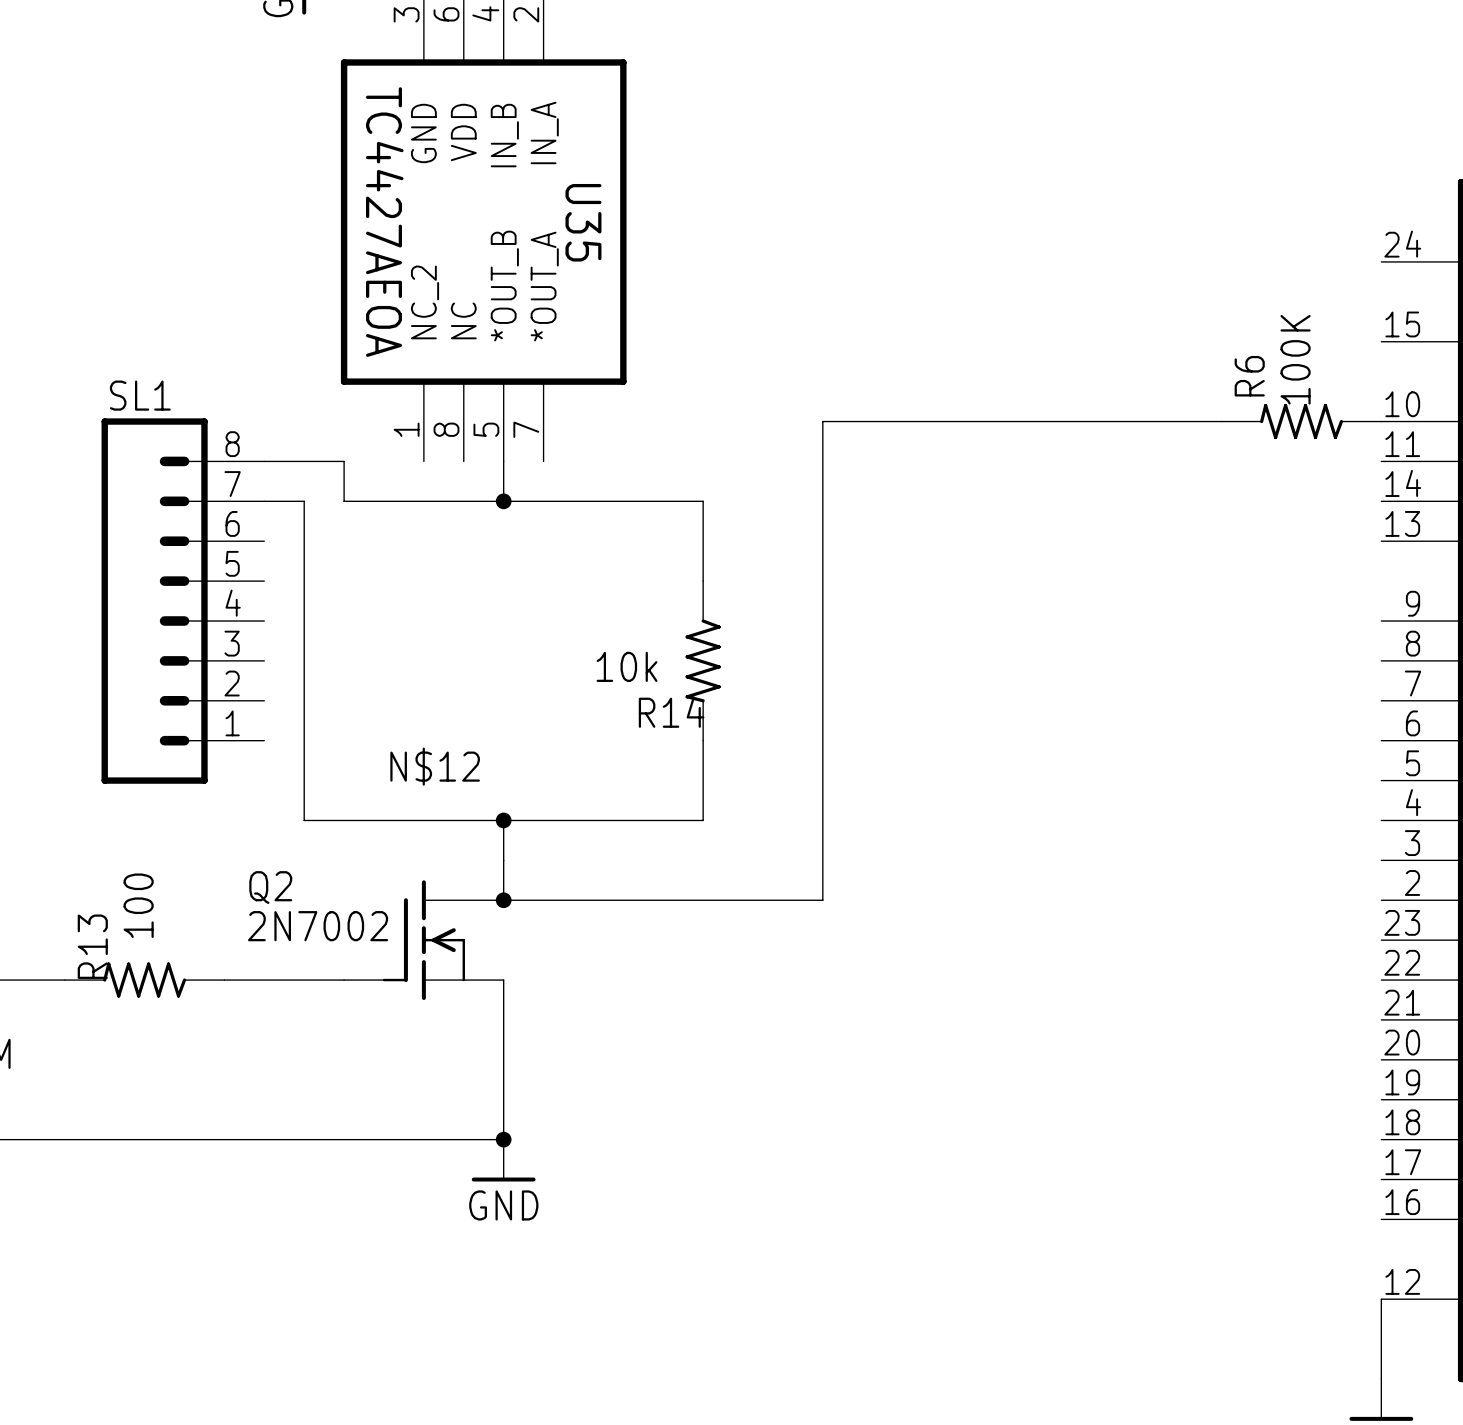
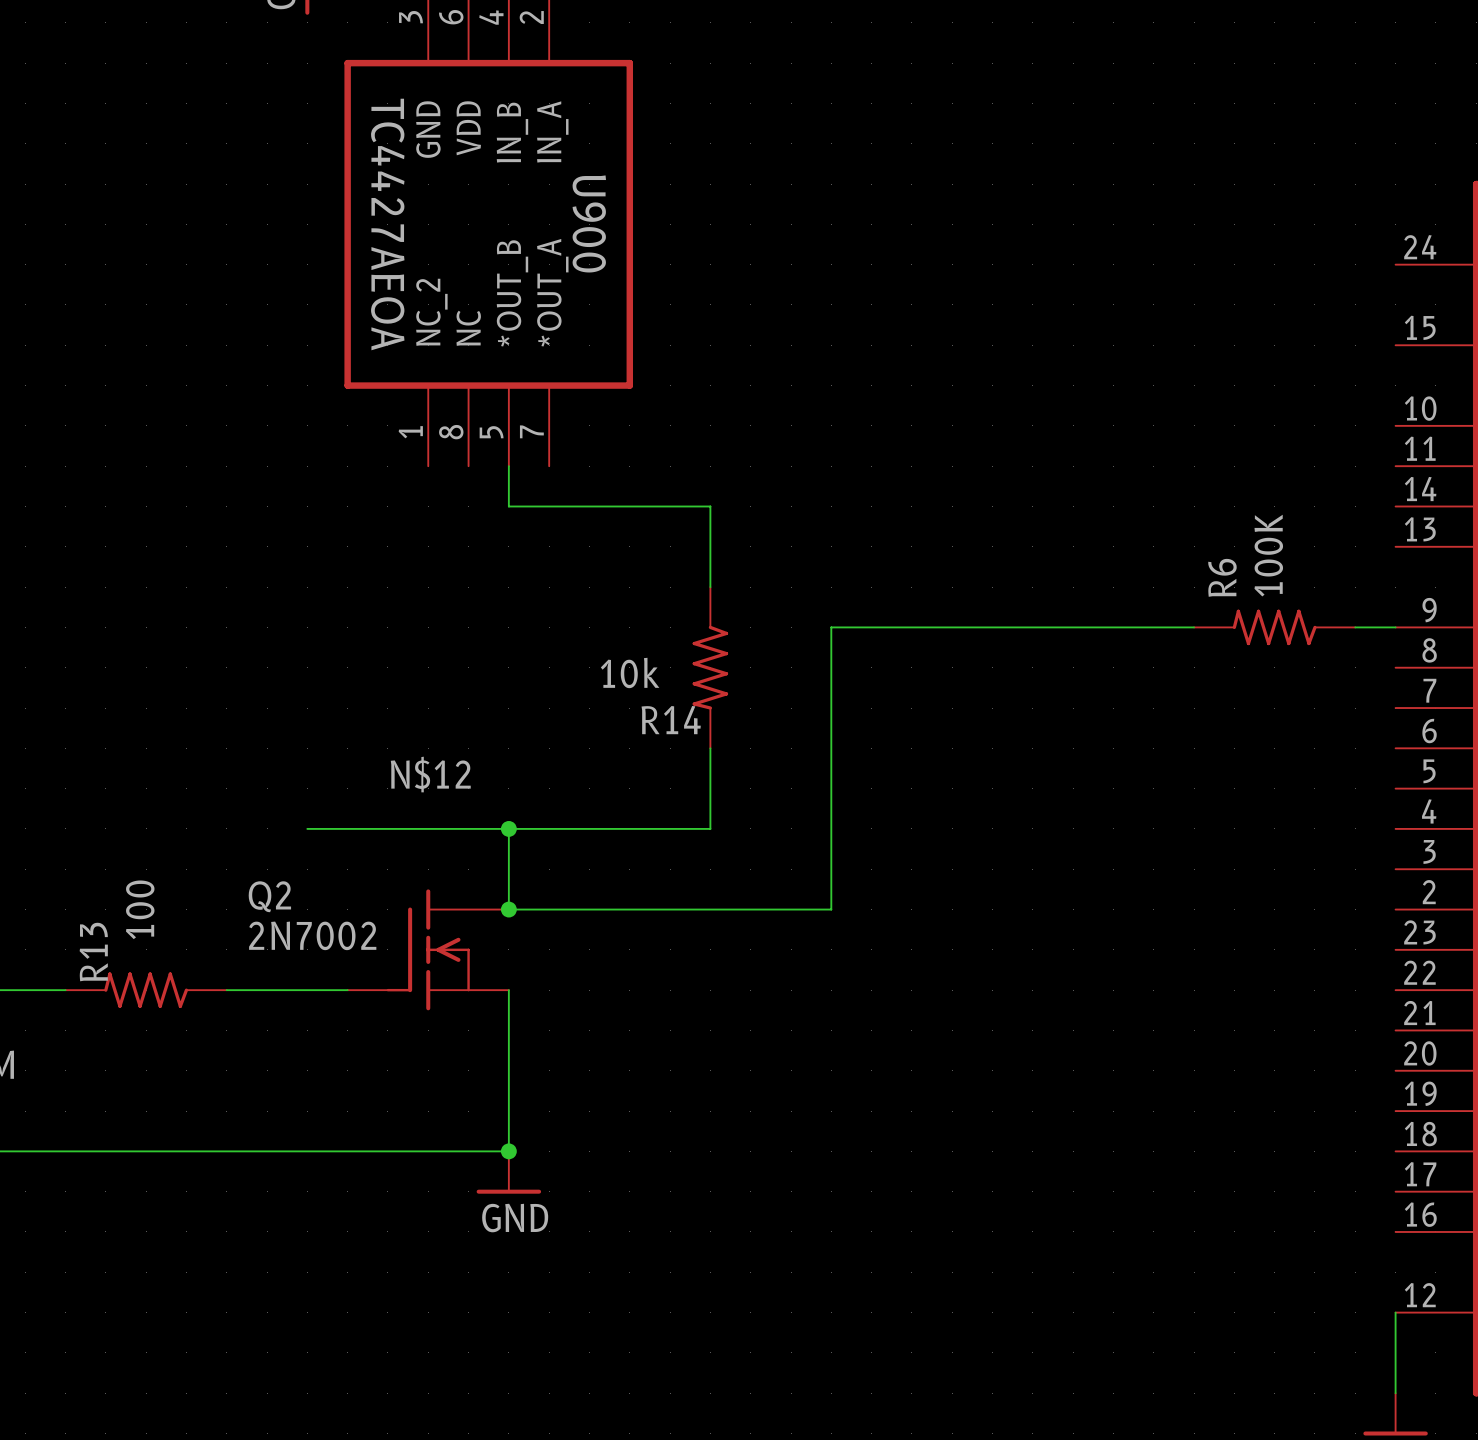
U35 name: U35 (583, 222) -> U900 (589, 223)
wire: (1221, 421) (822, 421) (822, 621) -> (1194, 627) (831, 627)
R6 position: (1301, 421) -> (1274, 627)
wire: (264, 461) (344, 461) (344, 501) (503, 501) -> none
wire: (264, 501) (304, 501) (304, 820) -> none
junction: (503, 501) -> none
SL1: (182, 601) -> none
wire: none -> (1355, 627) (1395, 627)

